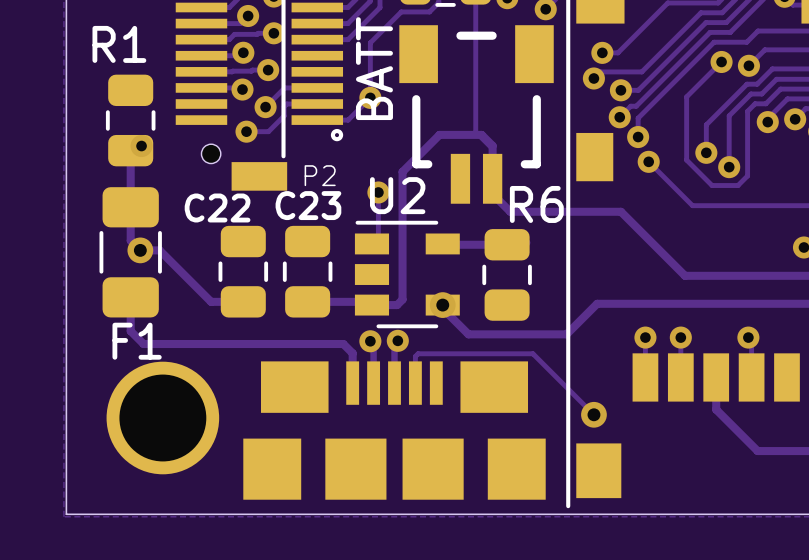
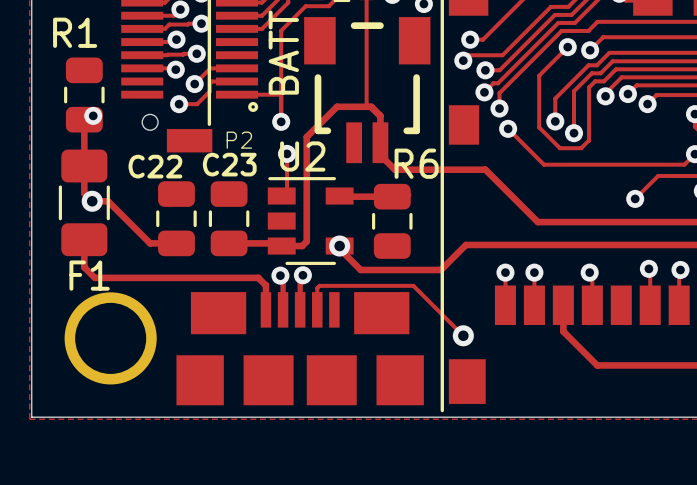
track: (371, 41) (370, 97) (348, 120) -> (281, 30) (281, 121)
via position: (370, 97) -> (281, 121)
track: none -> (281, 94) (262, 94)

